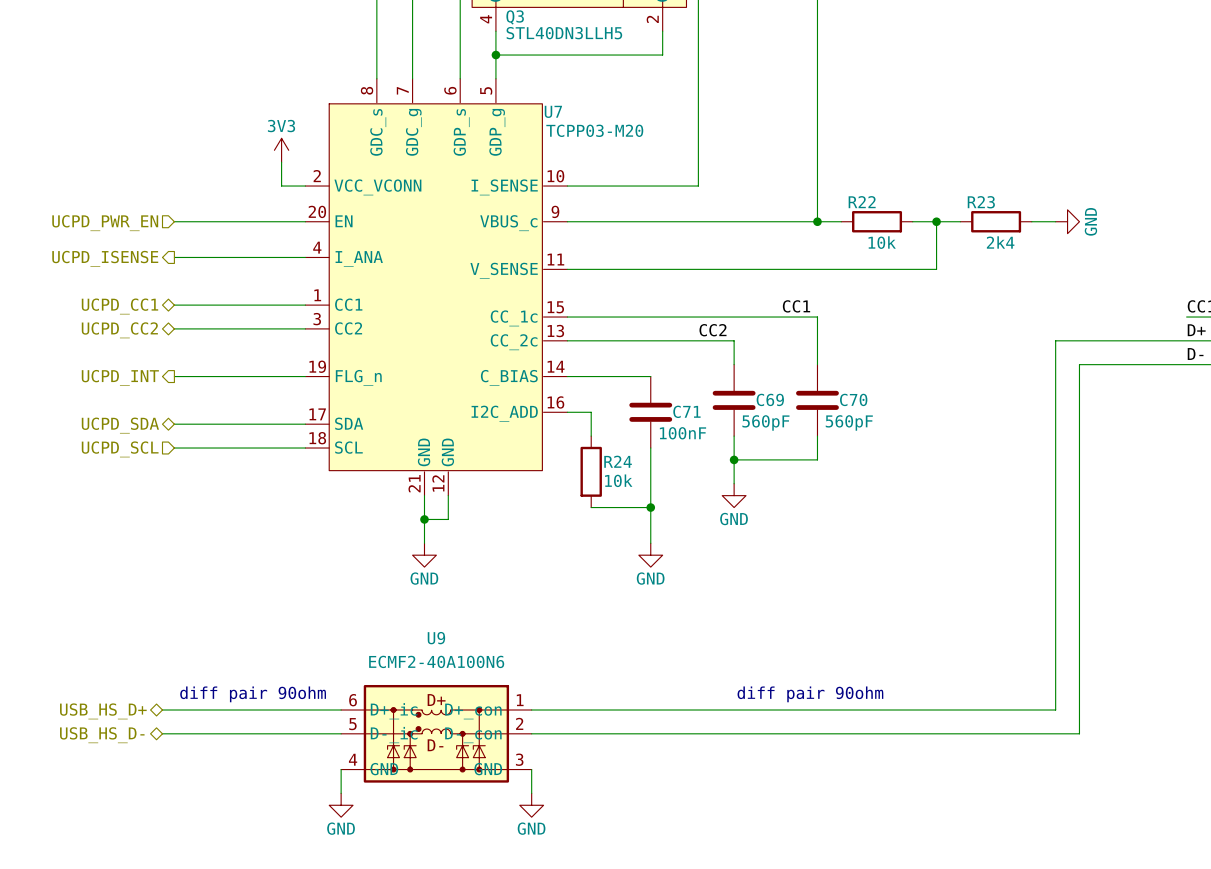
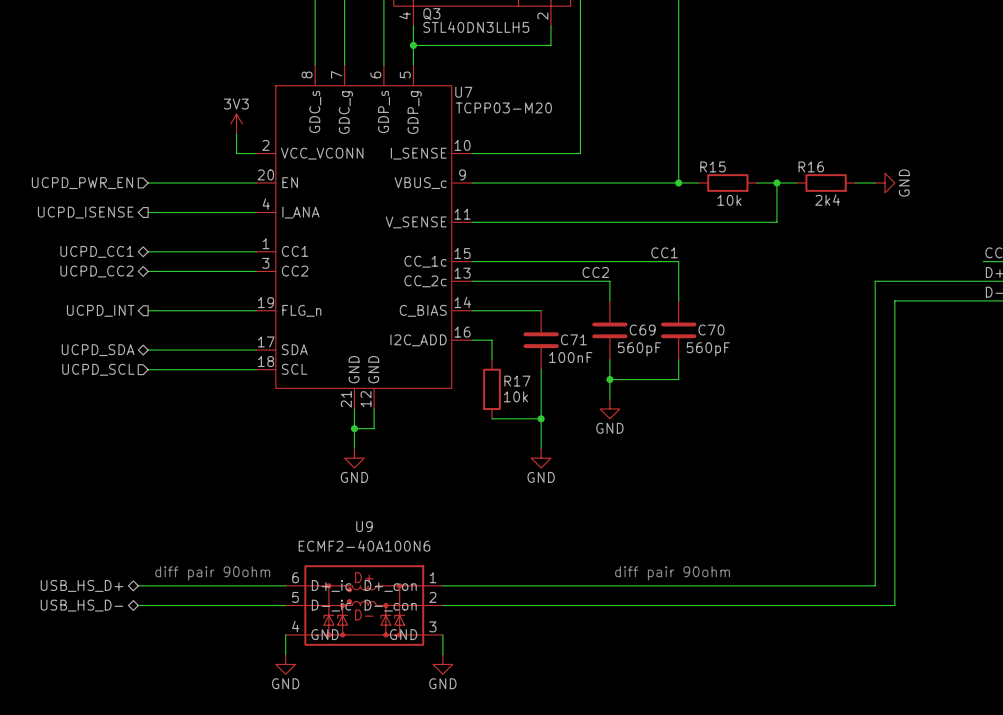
R22 name: R22 (862, 202) -> R15 (713, 166)
R23 name: R23 (981, 202) -> R16 (811, 166)
R24 name: R24 (618, 461) -> R17 (517, 381)

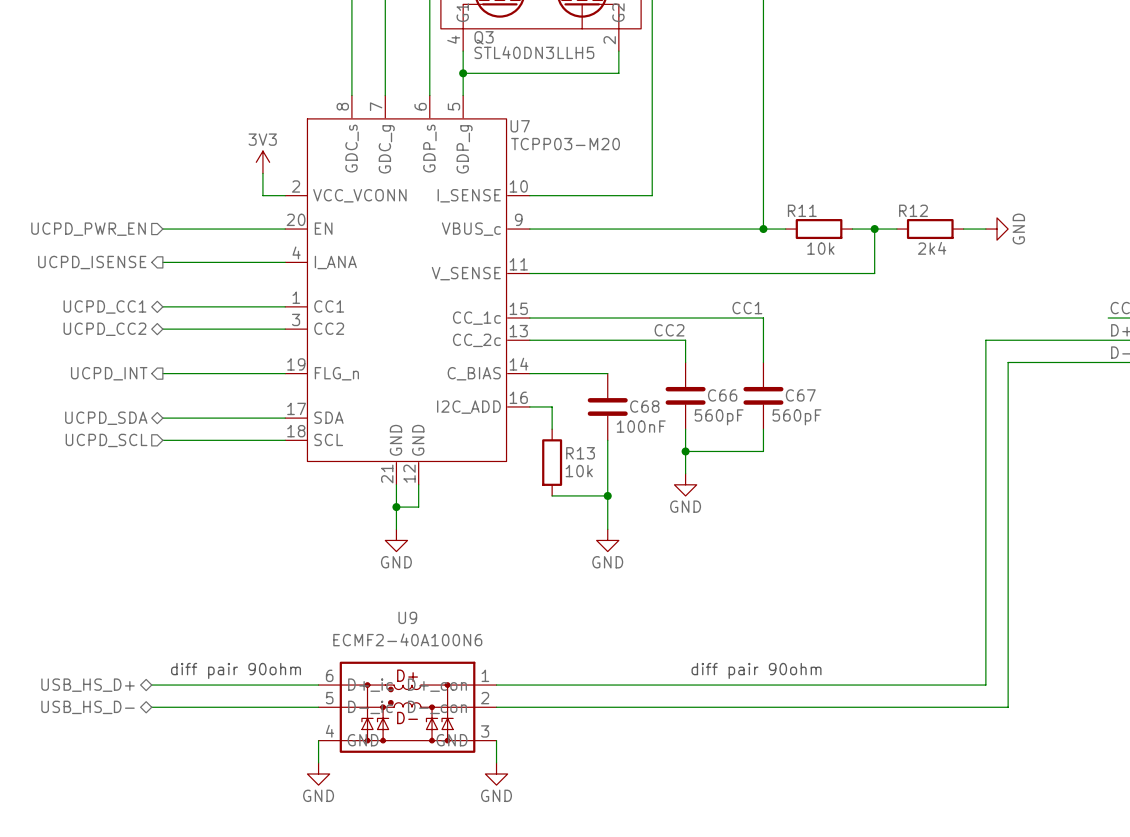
R15 name: R15 (713, 166) -> R11 (802, 210)
R16 name: R16 (811, 166) -> R12 (913, 210)
C69 name: C69 (642, 330) -> C66 (722, 395)
C70 name: C70 (711, 330) -> C67 (800, 395)
C71 name: C71 (573, 339) -> C68 (644, 406)
R17 name: R17 (517, 381) -> R13 (580, 453)

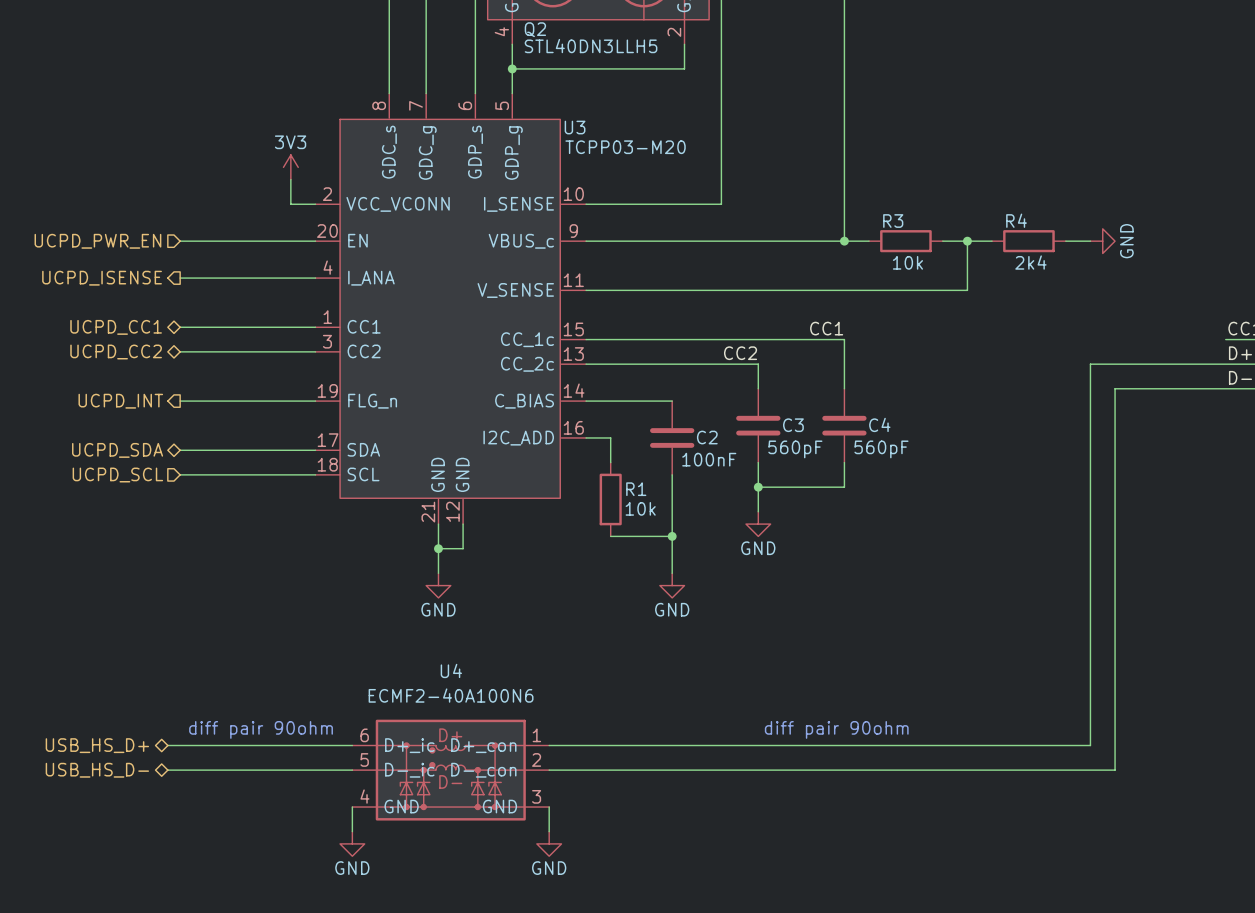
Q3 name: Q3 (484, 37) -> Q2 (535, 29)
U7 name: U7 (520, 126) -> U3 (575, 127)
R11 name: R11 (802, 210) -> R3 (893, 221)
R12 name: R12 (913, 210) -> R4 (1016, 220)
C66 name: C66 (722, 395) -> C3 (793, 425)
C67 name: C67 (800, 395) -> C4 (879, 424)
C68 name: C68 (644, 406) -> C2 (707, 437)
R13 name: R13 (580, 453) -> R1 (636, 489)
U9 name: U9 (407, 617) -> U4 (451, 670)

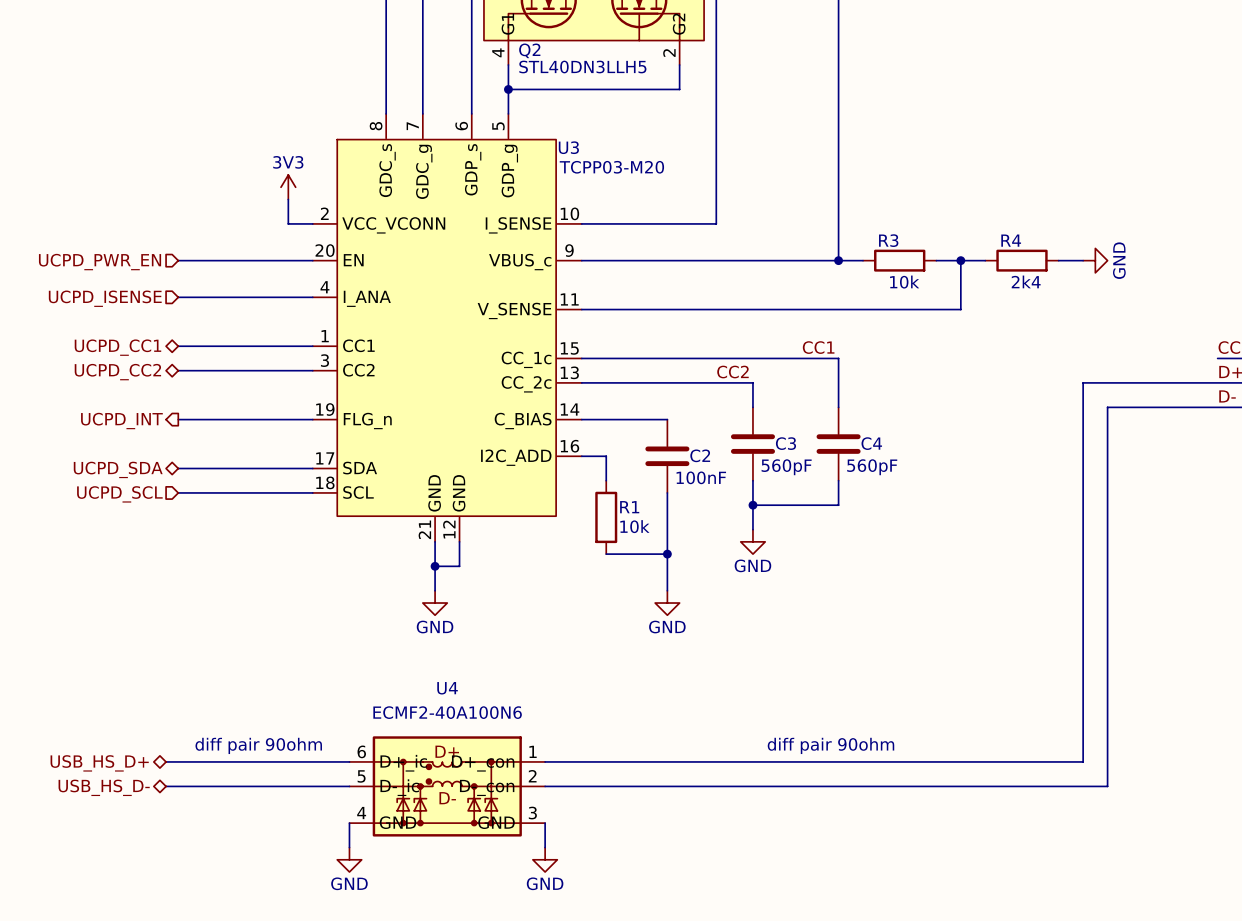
hierarchical label shape: output (102, 278) -> input (105, 298)

